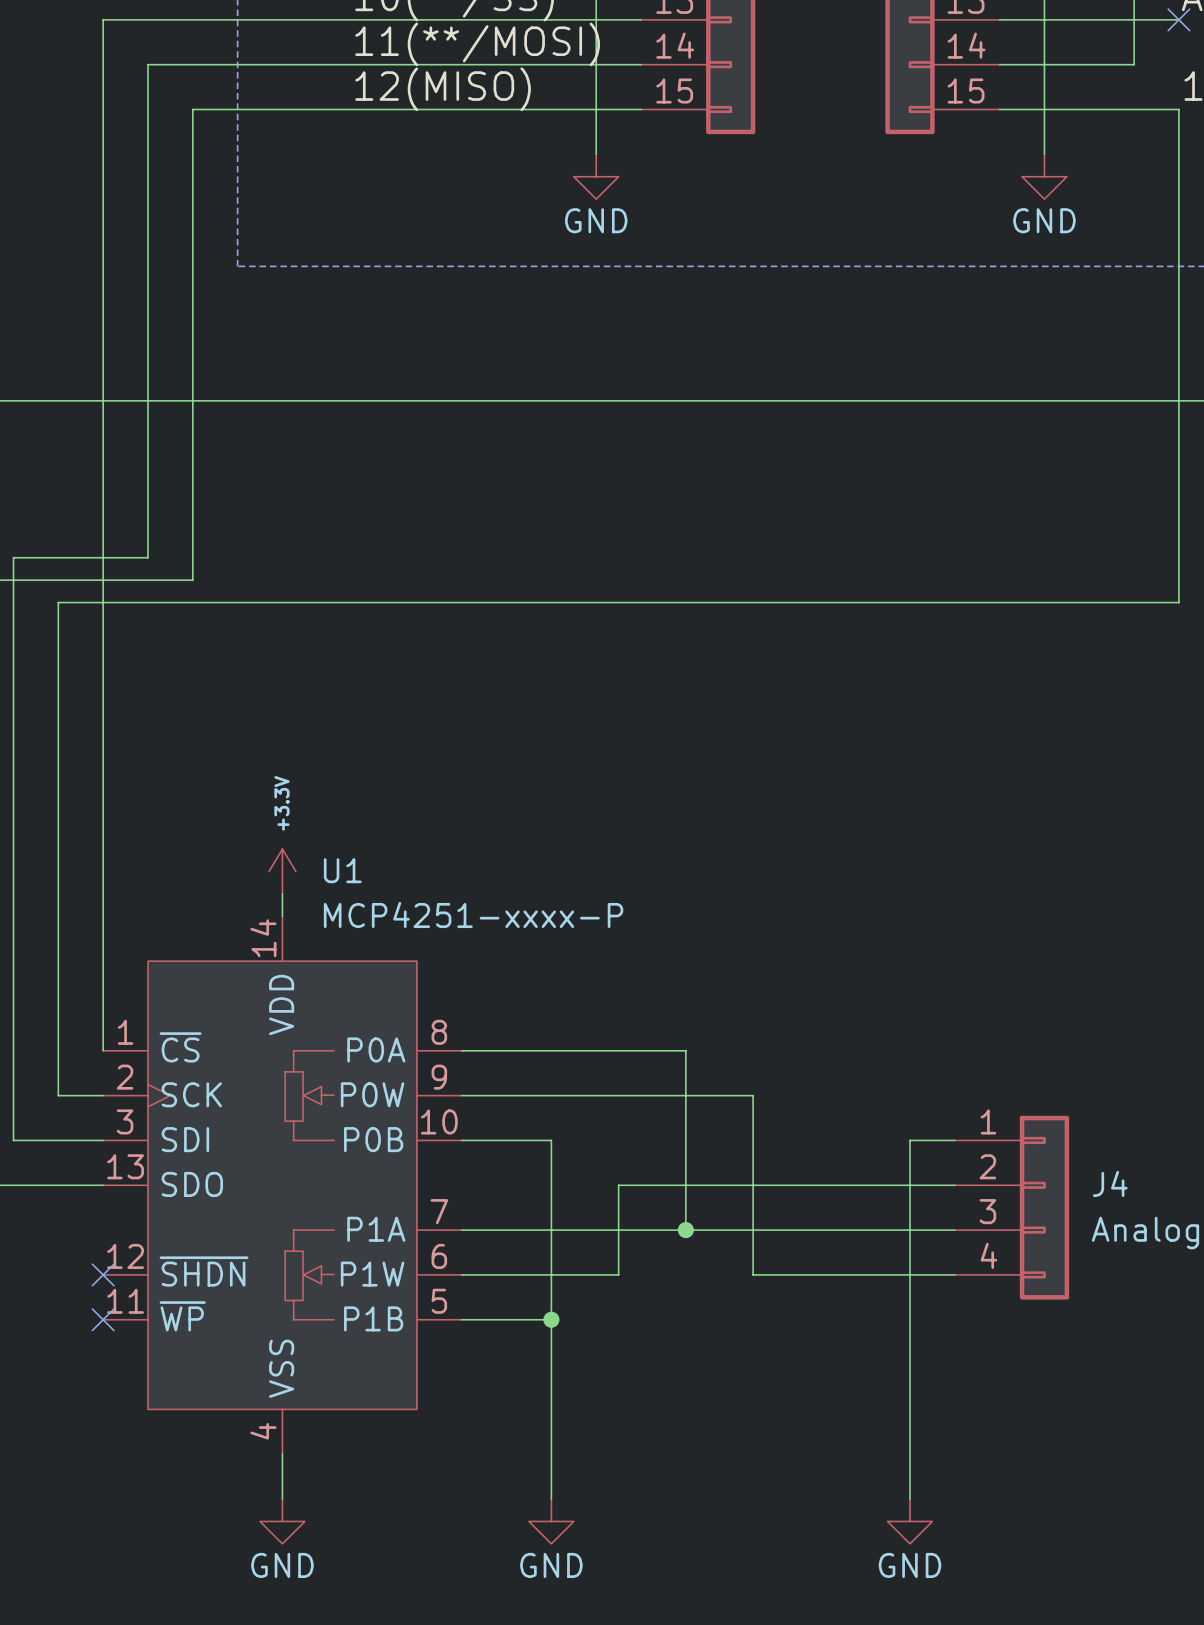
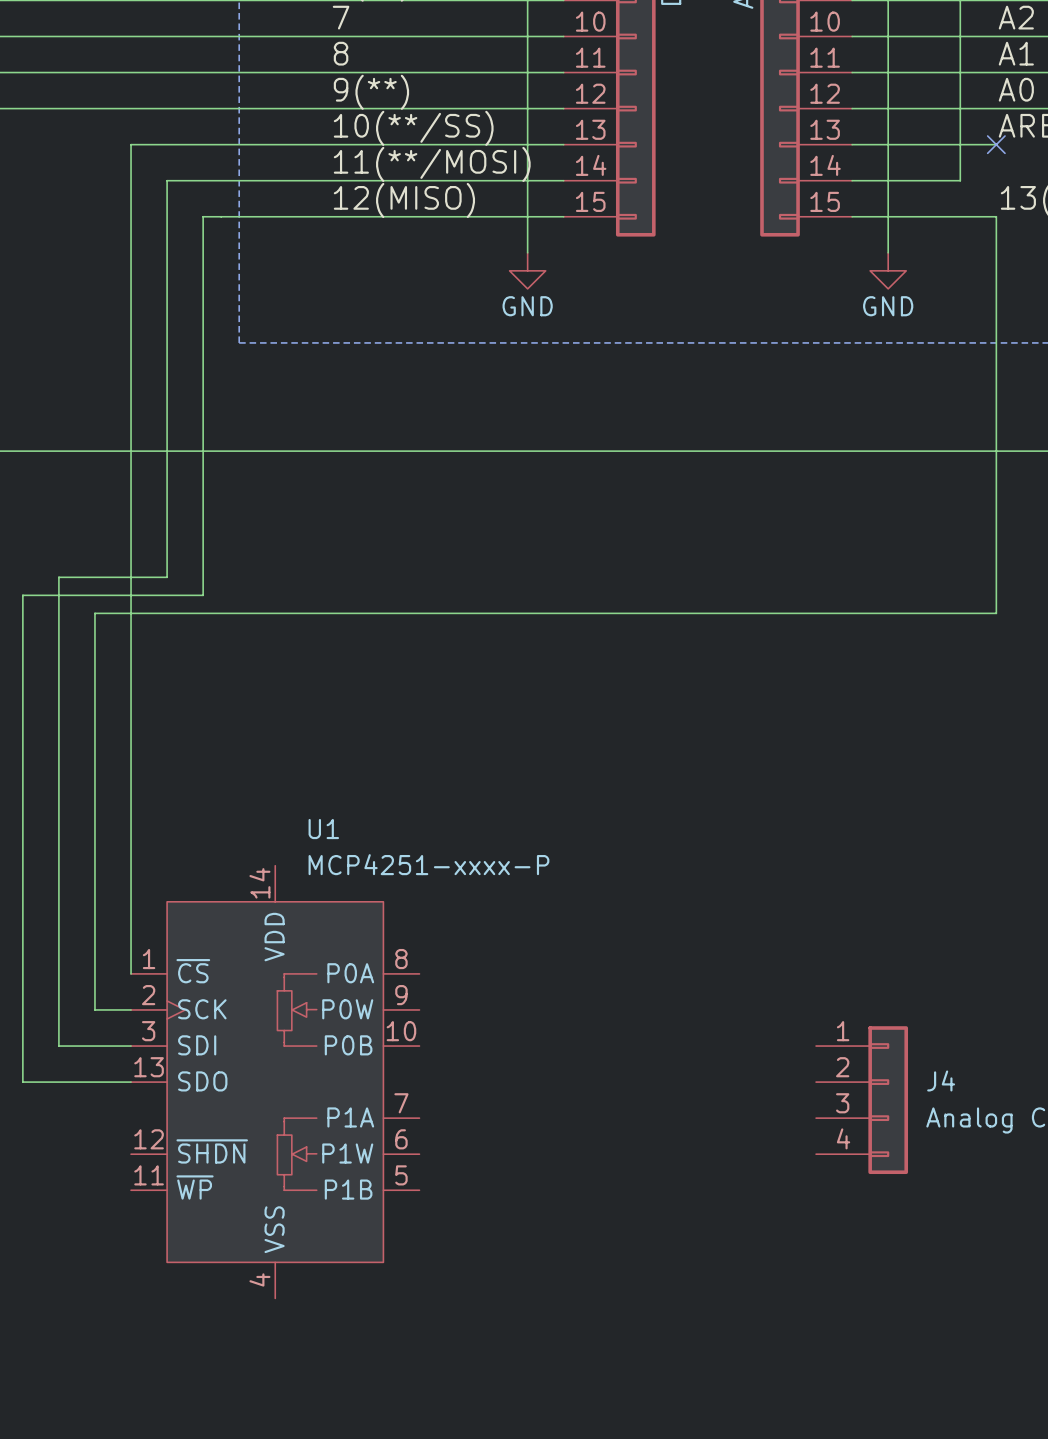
power symbol: +3.3V (282, 871) -> none
wire: (282, 893) (282, 916) -> none
wire: (461, 1050) (685, 1050) (685, 1230) -> none
wire: (461, 1095) (753, 1095) (753, 1274) (954, 1274) -> none
wire: (461, 1140) (551, 1140) (551, 1499) -> none
wire: (954, 1140) (909, 1140) (909, 1499) -> none
wire: (954, 1185) (618, 1185) (618, 1274) (461, 1274) -> none
wire: (461, 1230) (954, 1230) -> none
junction: (685, 1230) -> none
no-connect mark: (103, 1274) -> none
no-connect mark: (103, 1319) -> none
wire: (461, 1319) (551, 1319) -> none
junction: (551, 1319) -> none
wire: (282, 1454) (282, 1499) -> none
power symbol: GND (282, 1521) -> none
power symbol: GND (551, 1521) -> none
power symbol: GND (909, 1521) -> none

